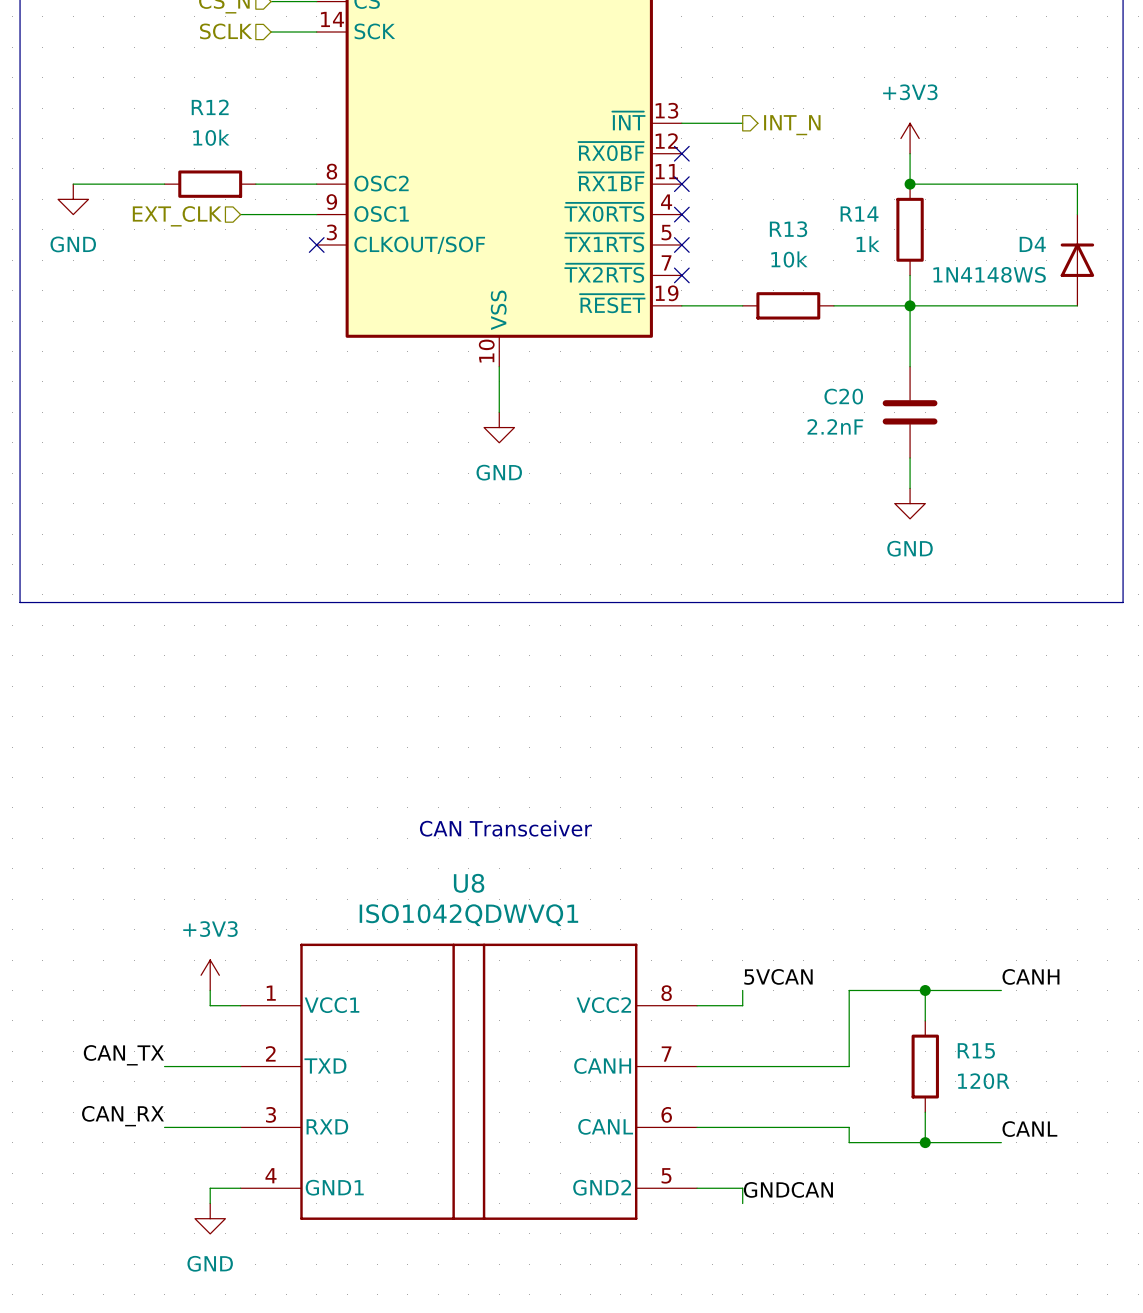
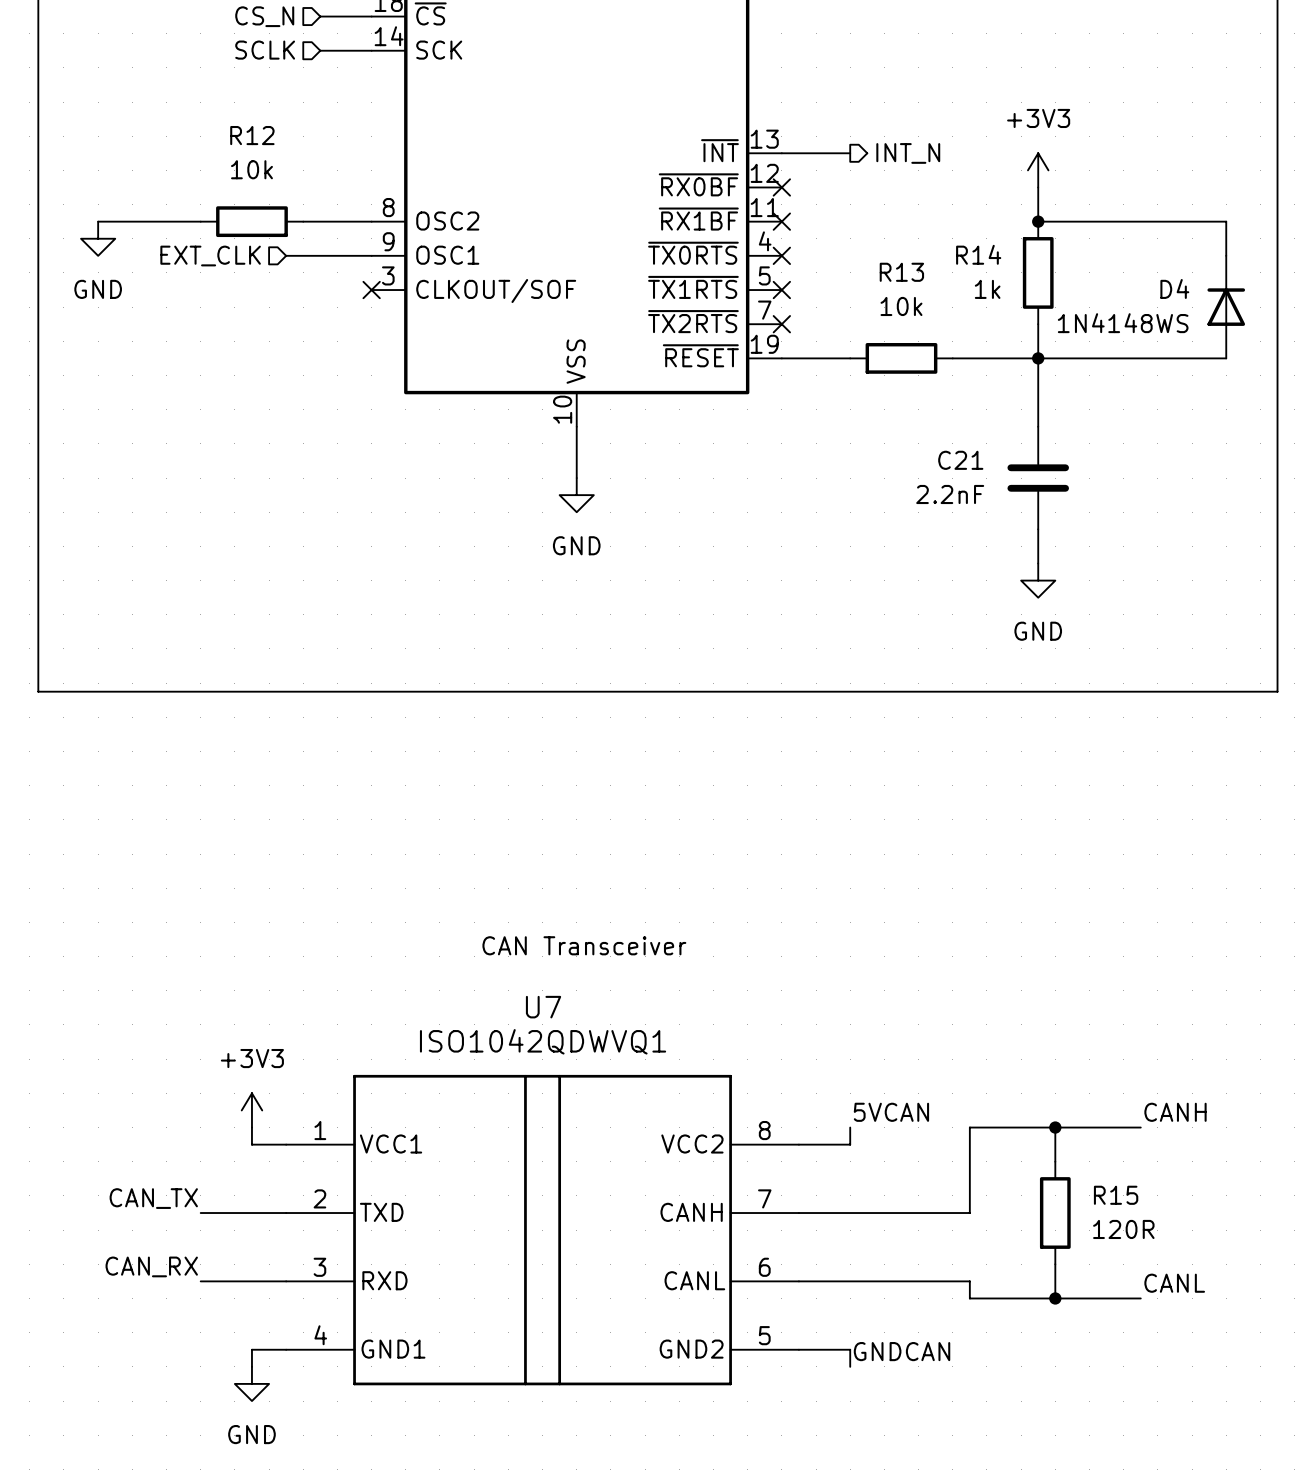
C20 name: C20 (843, 396) -> C21 (960, 460)
U8 name: U8 (469, 883) -> U7 (543, 1007)

